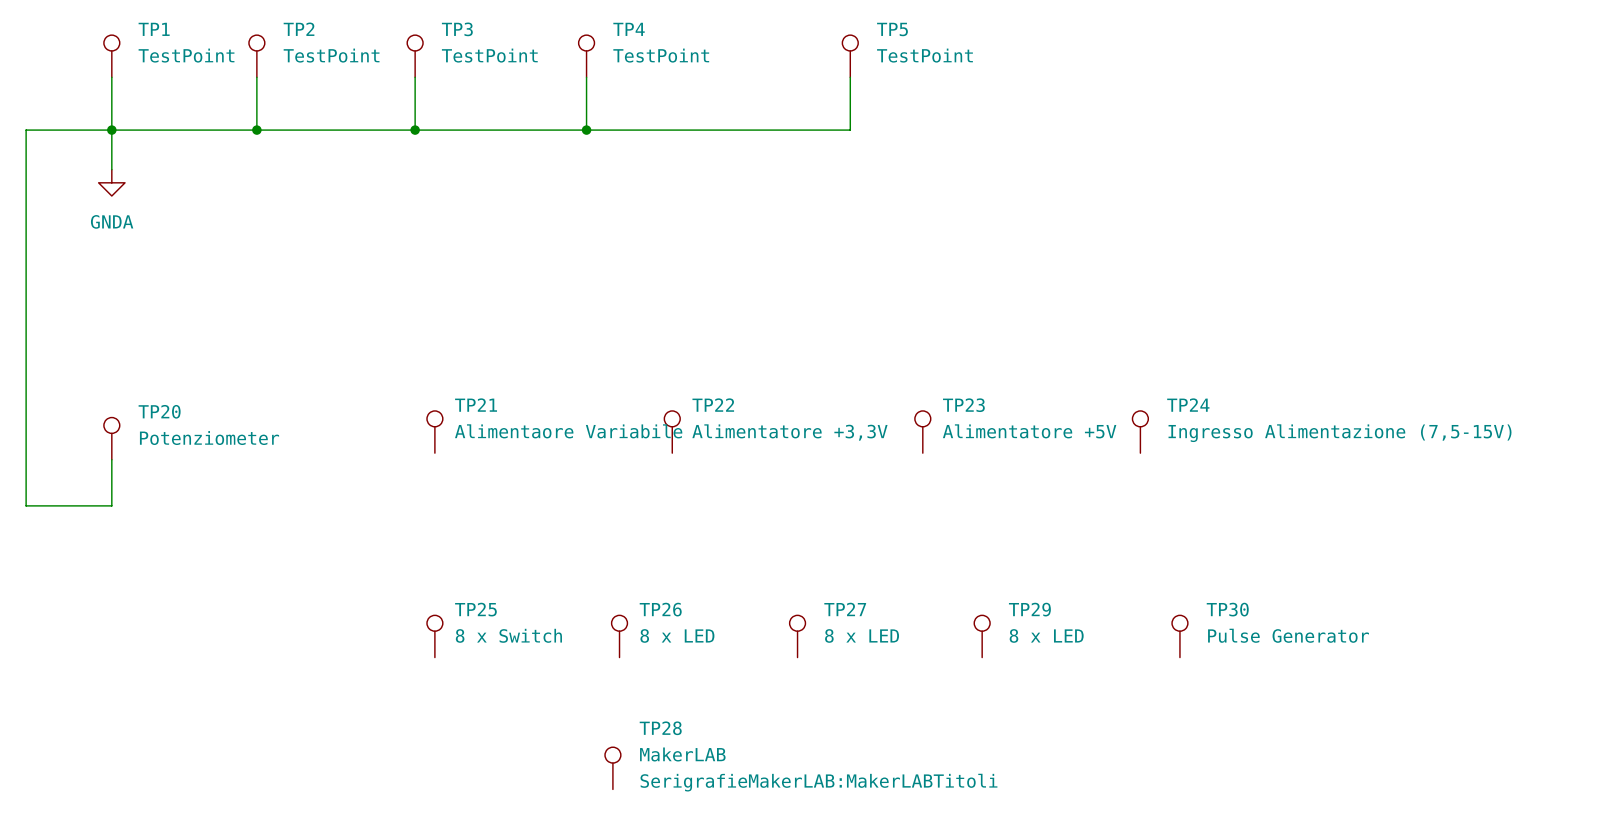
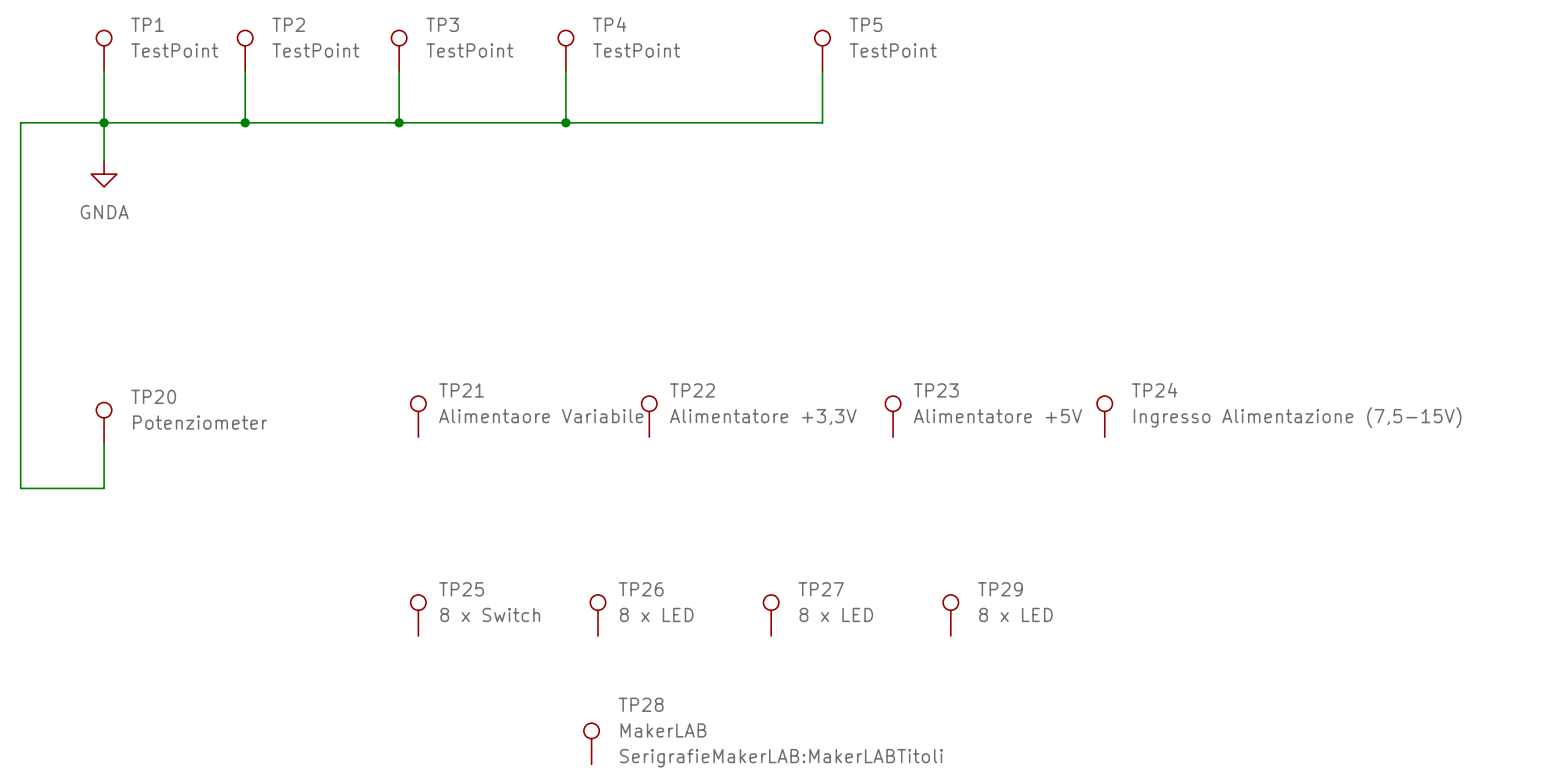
TP30: Pulse Generator (1179, 636) -> none

